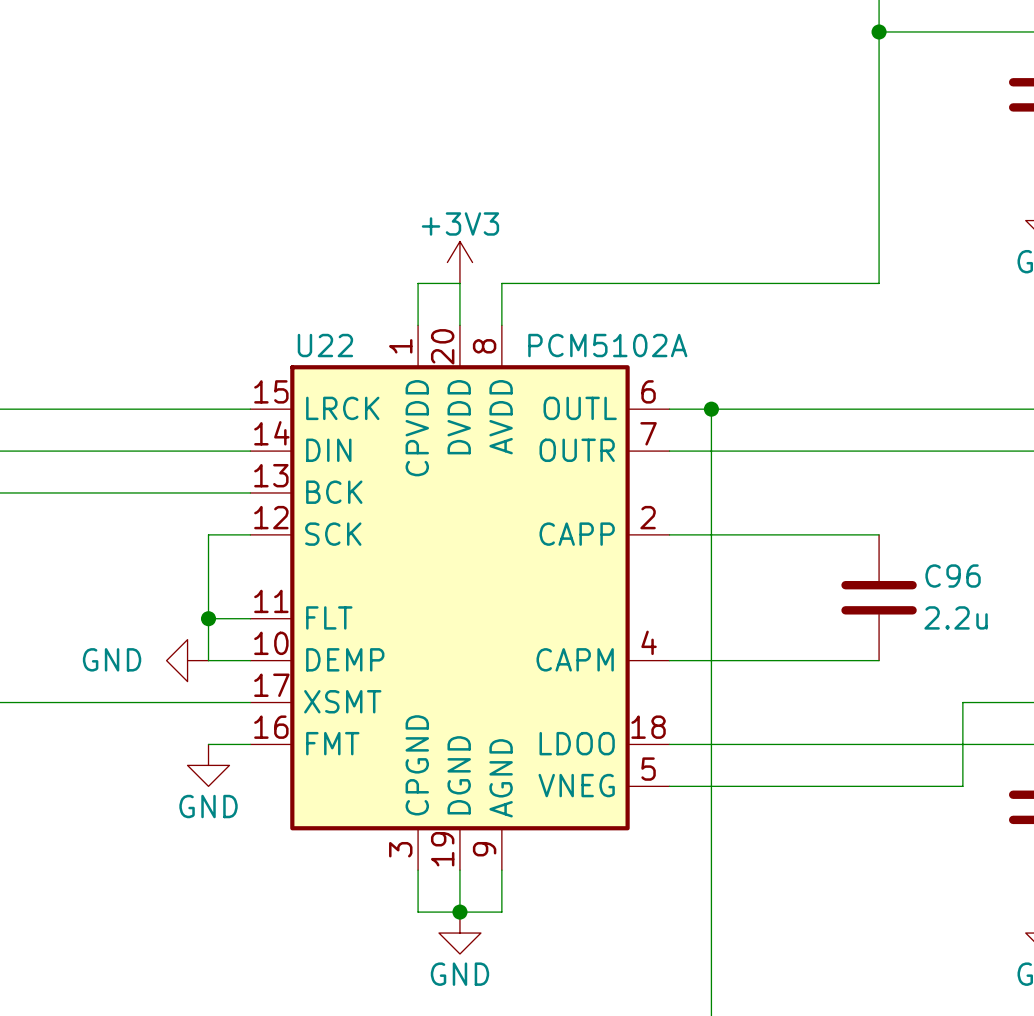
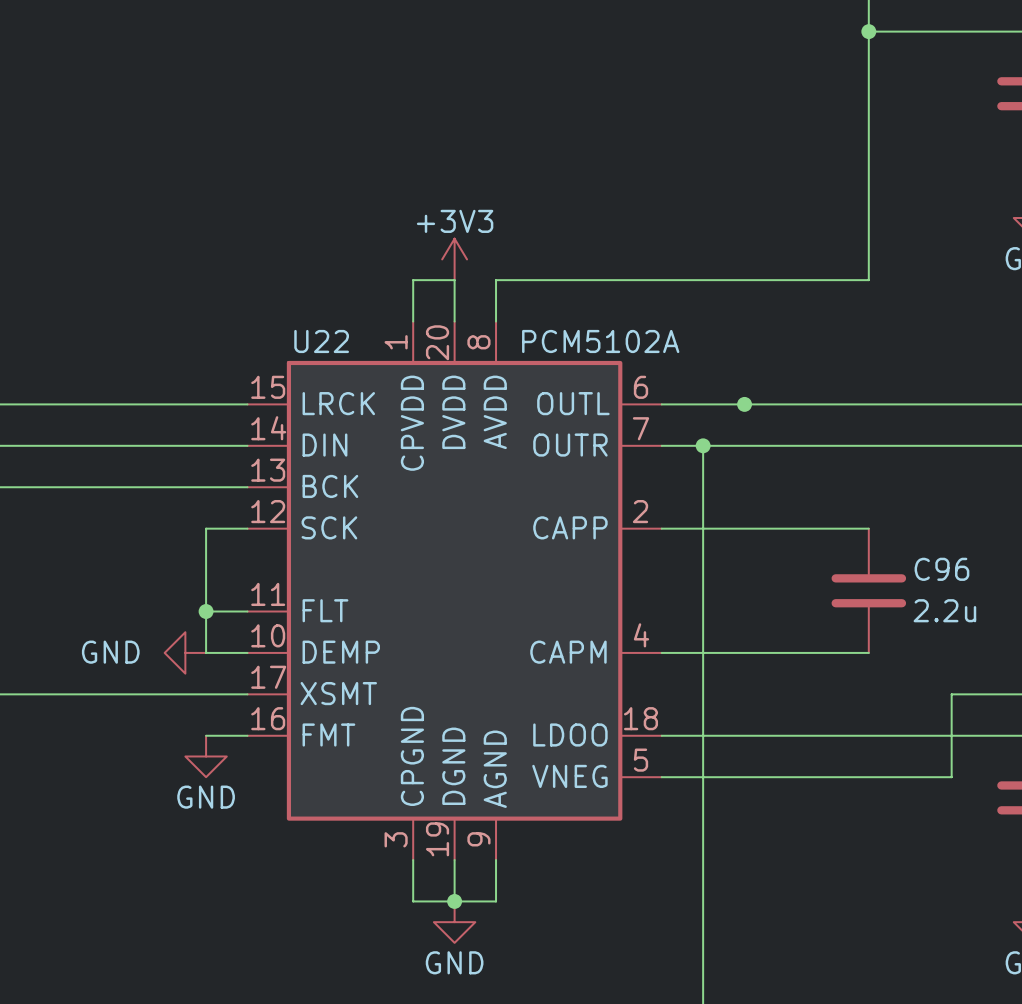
wire: (711, 409) (711, 451) -> none
junction: (711, 409) -> none
junction: none -> (744, 404)
junction: none -> (703, 445)

